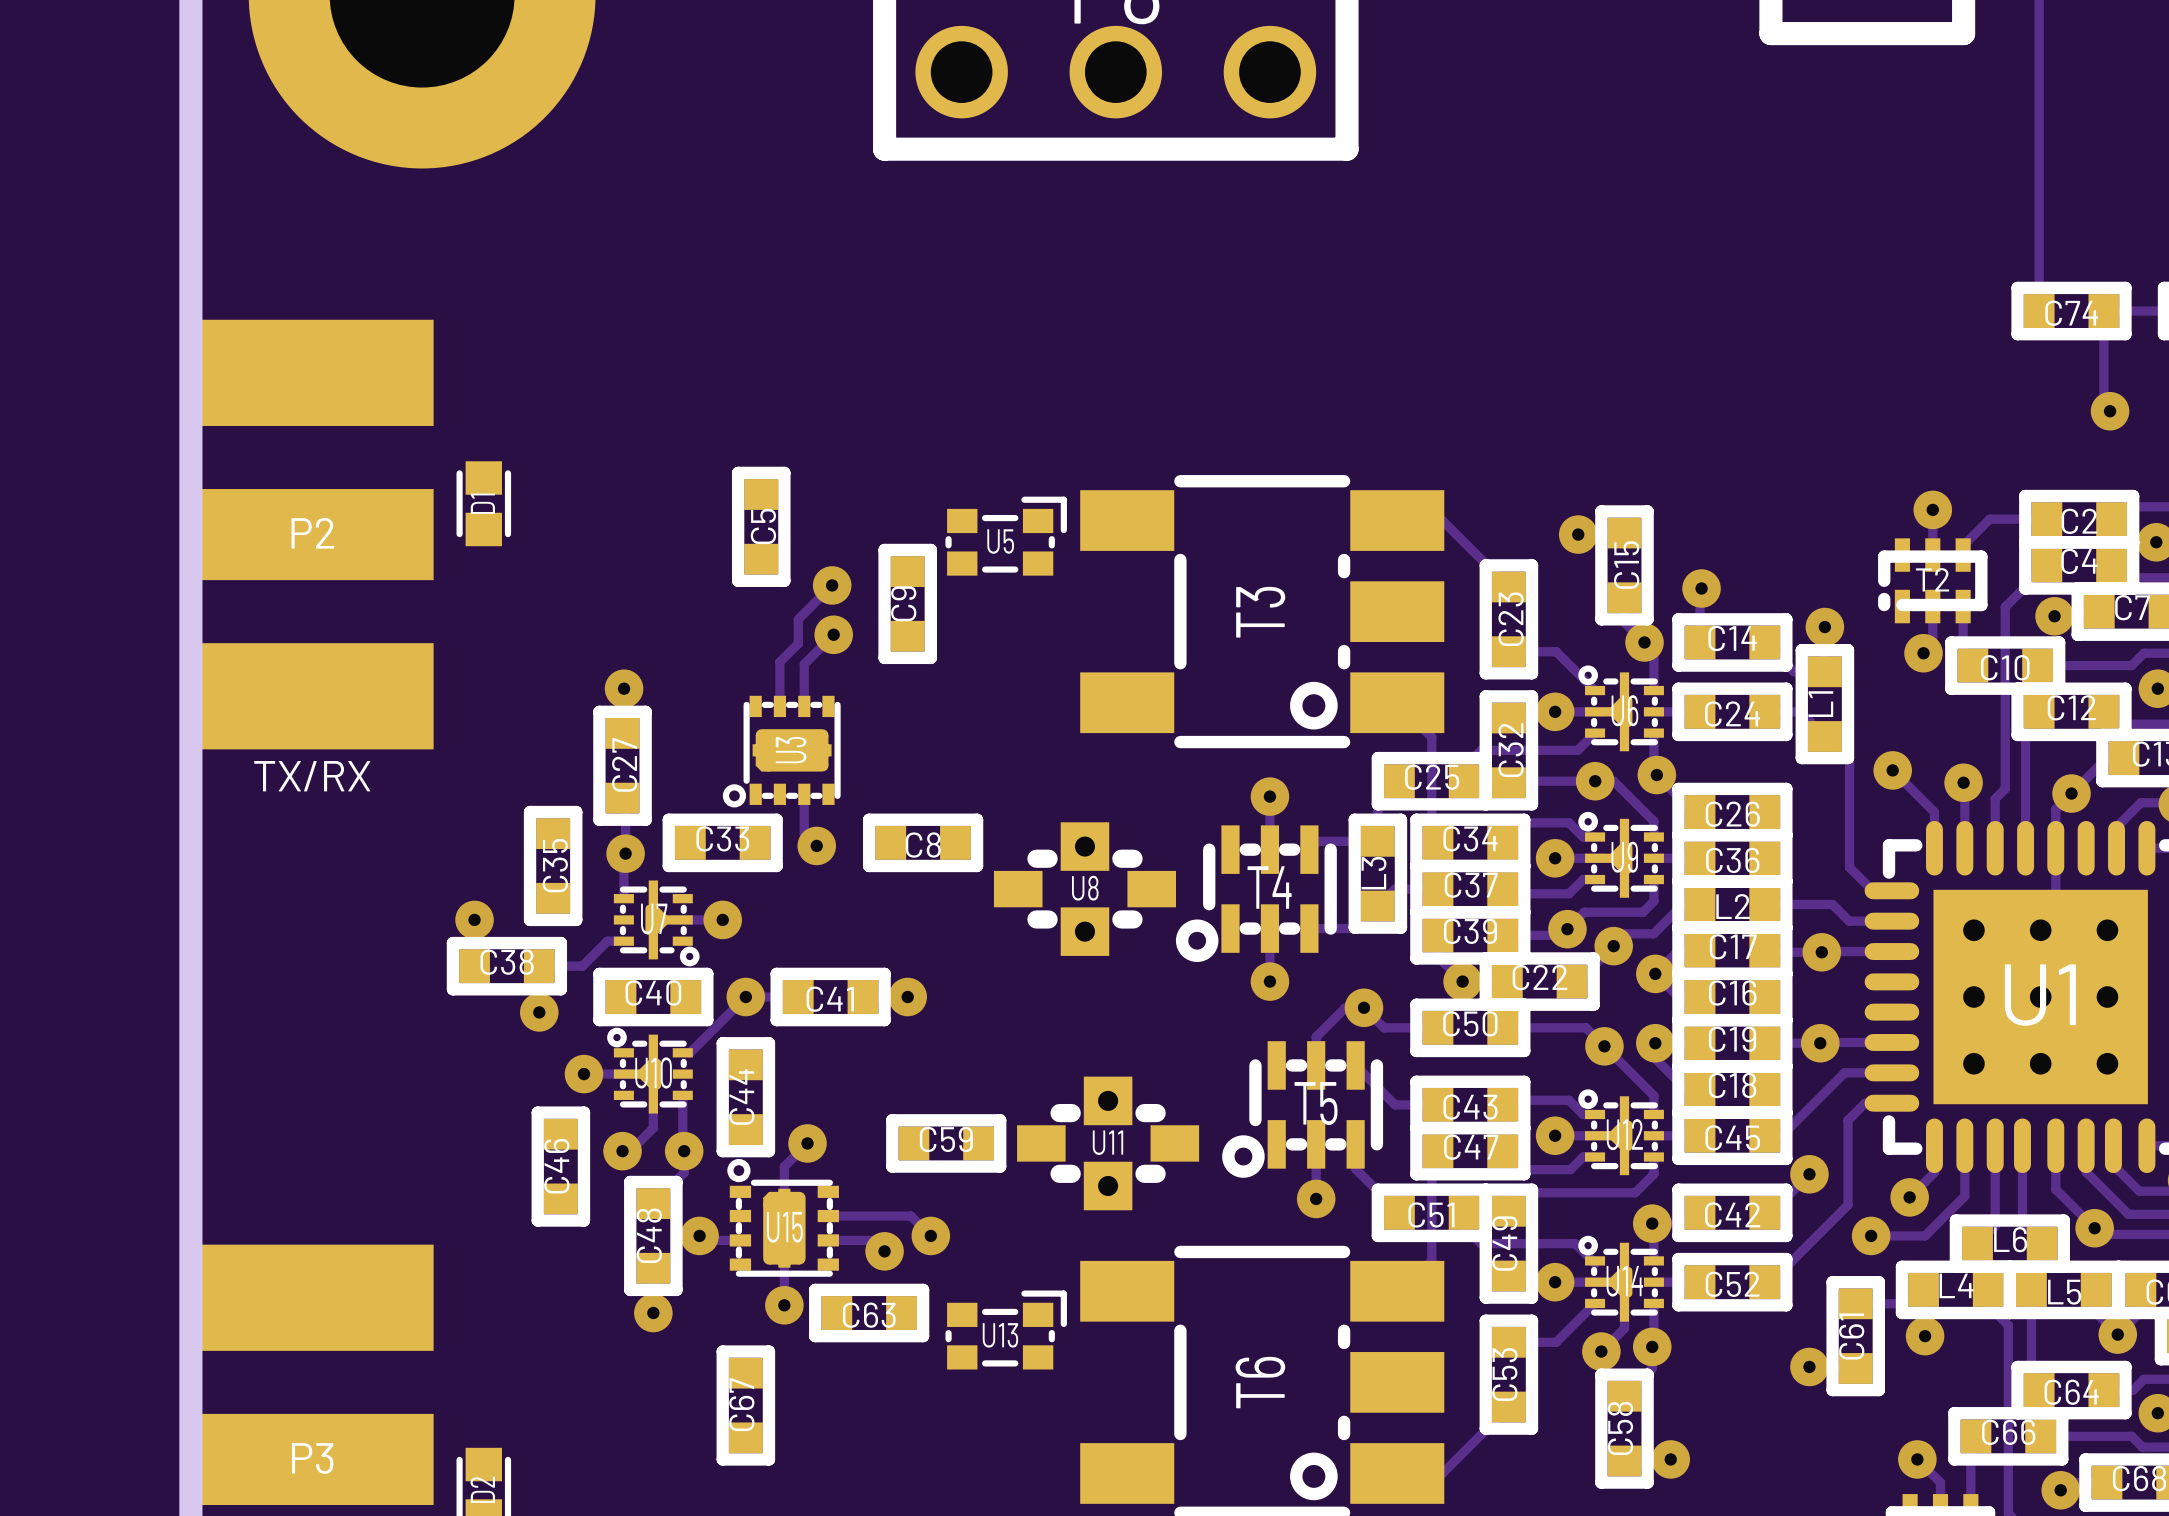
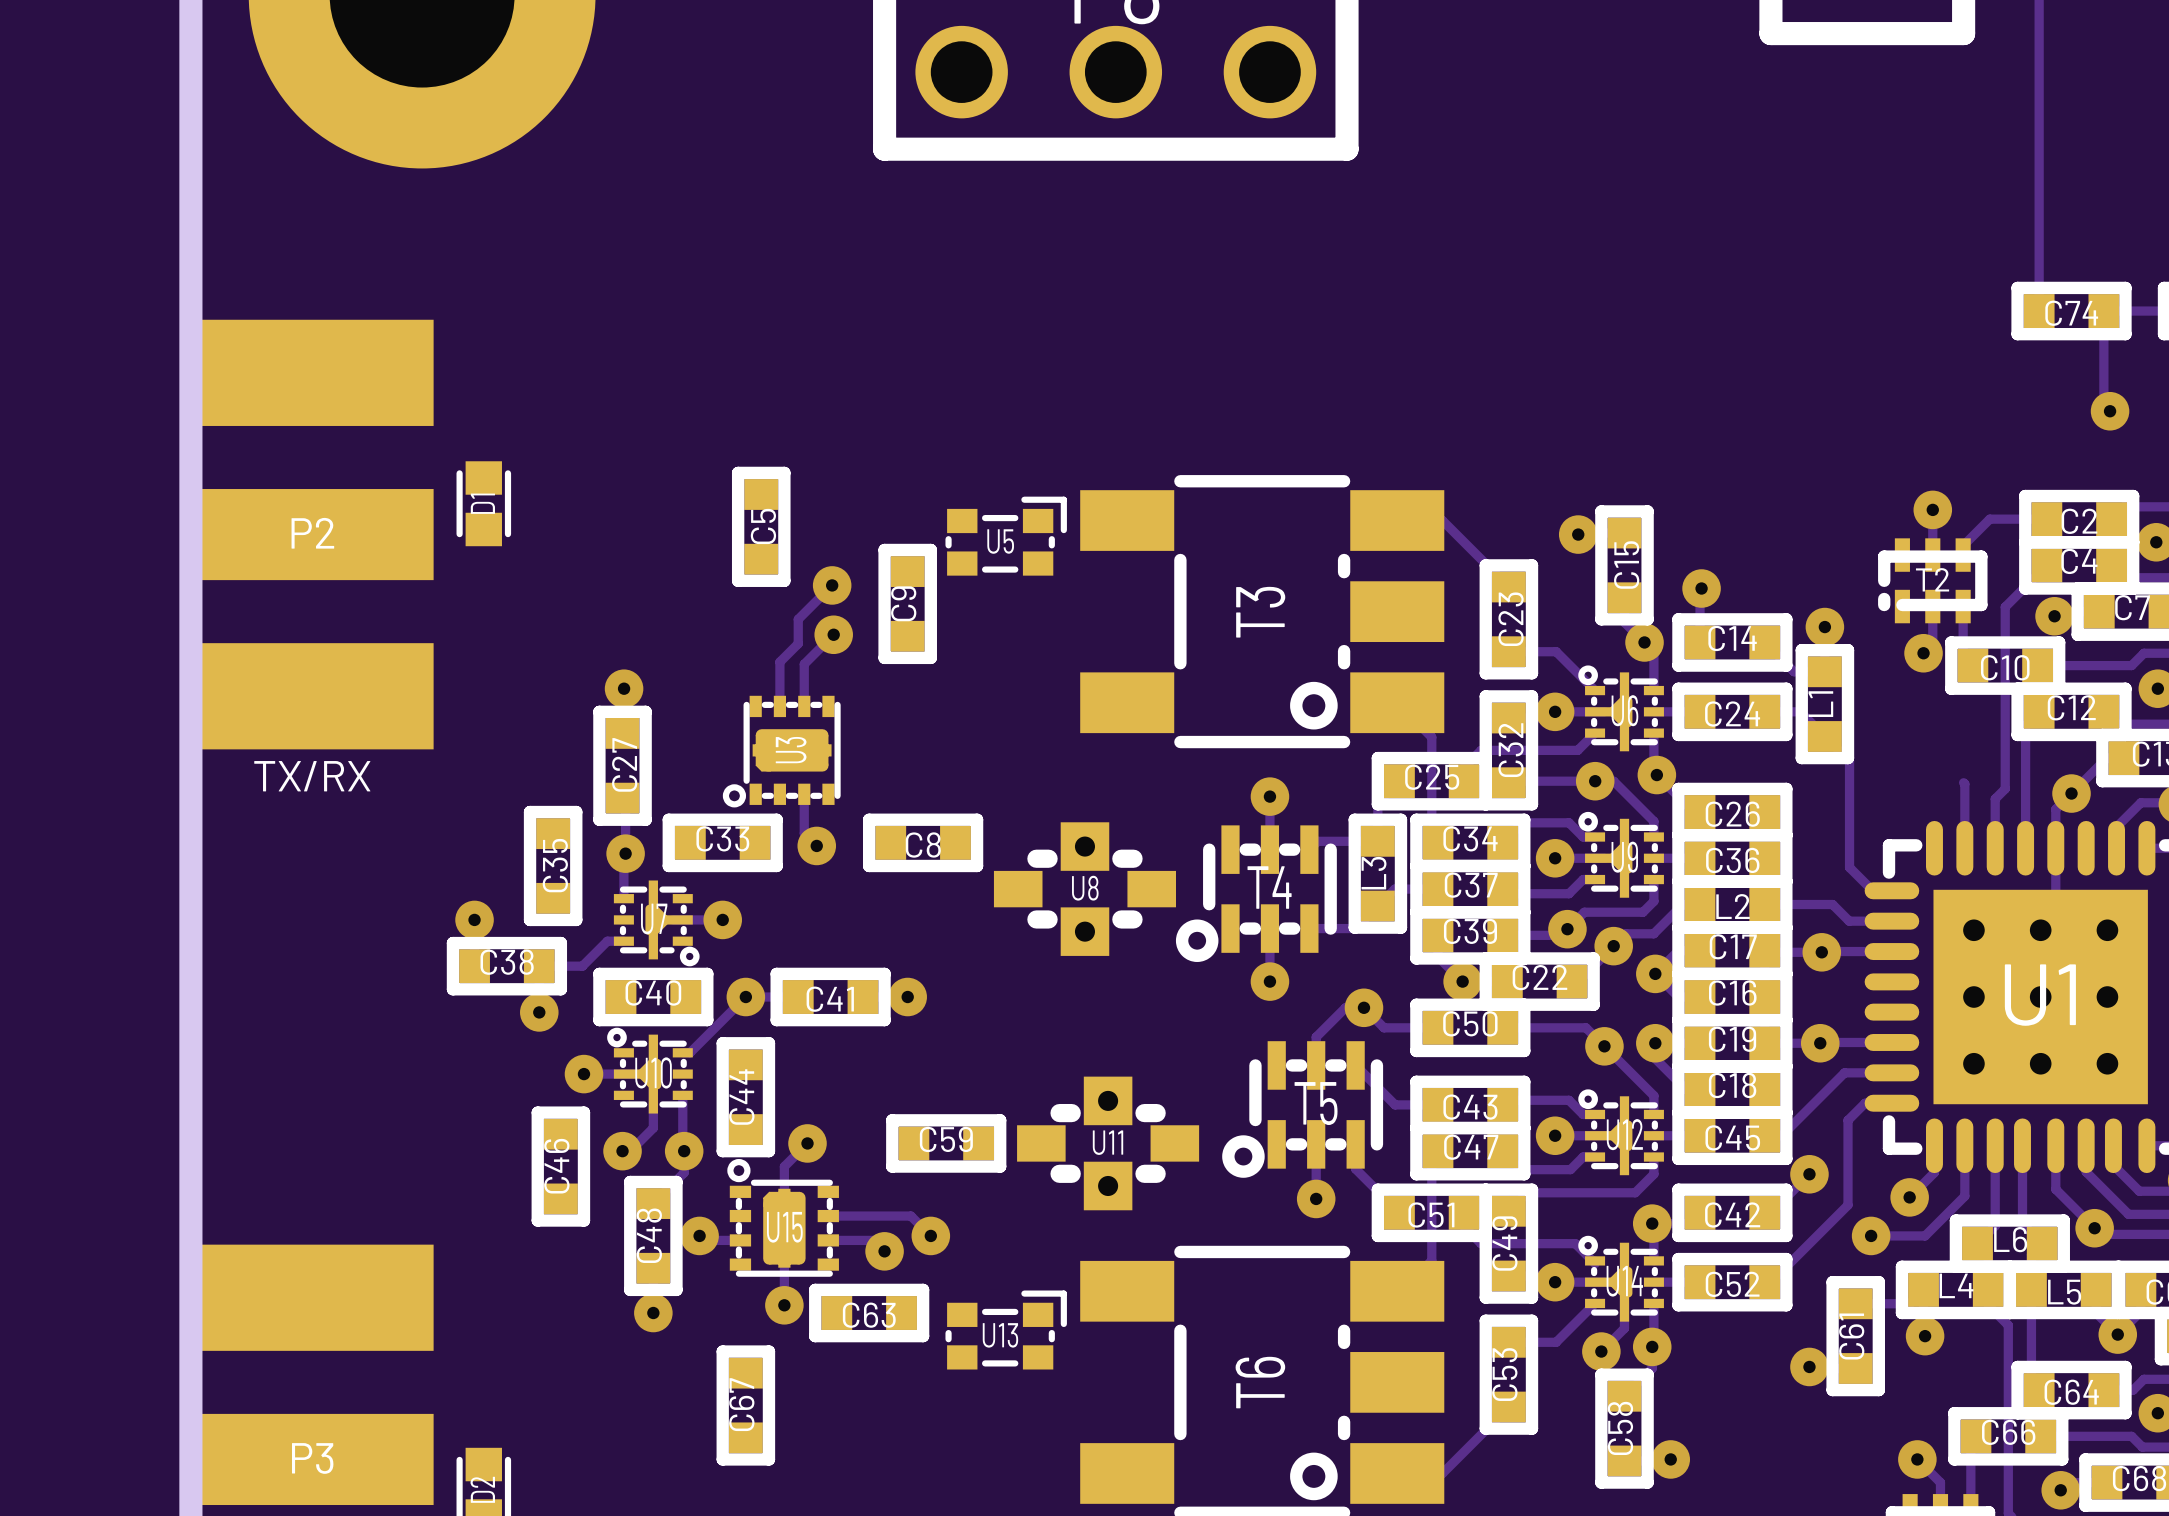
track: (1892, 770) (1934, 812) (1934, 848) -> none
via: (1892, 770) -> none
via: (1963, 782) -> none

